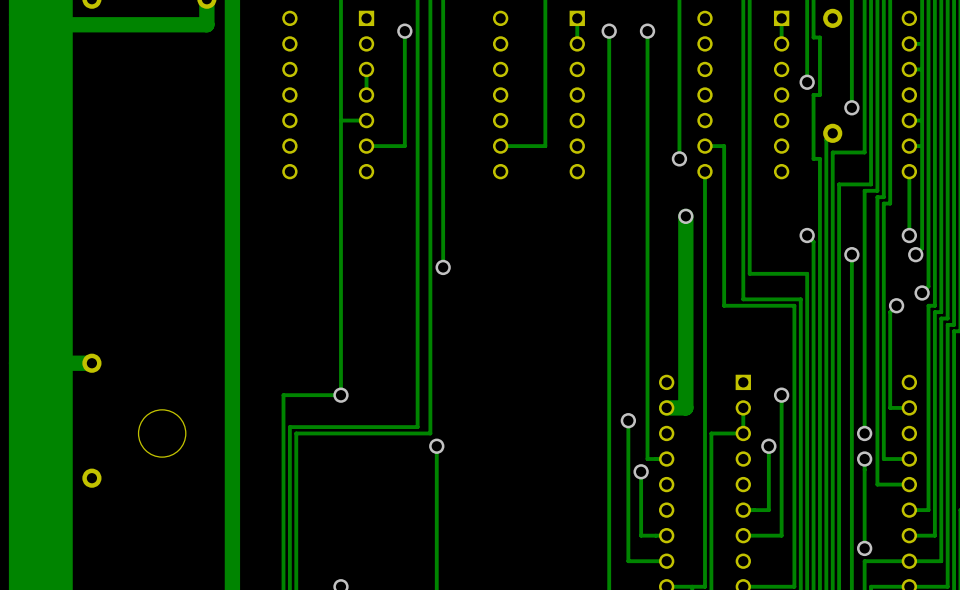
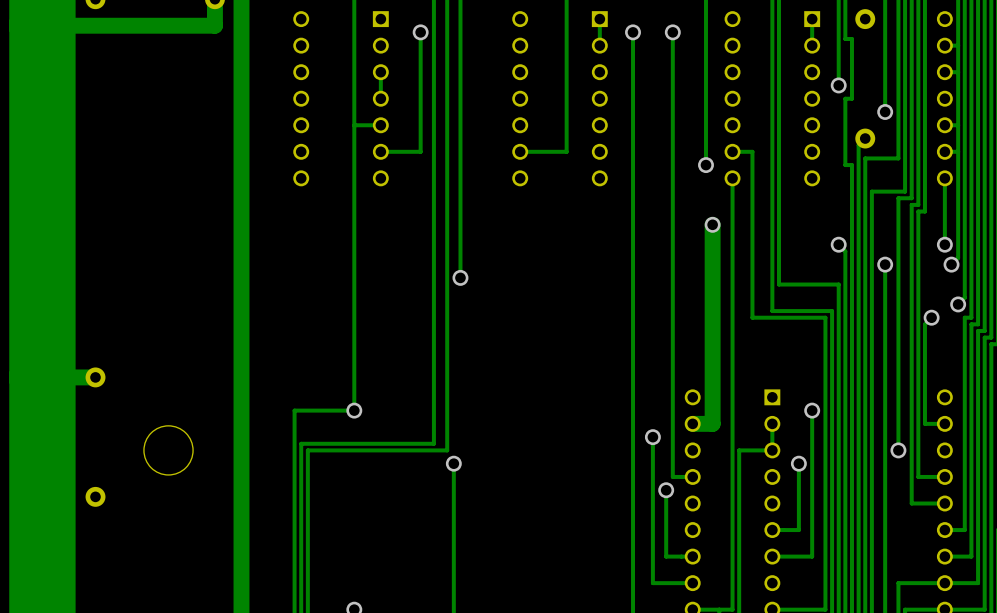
track: (864, 459) (864, 548) -> none
via: (864, 459) -> none
via: (864, 548) -> none

